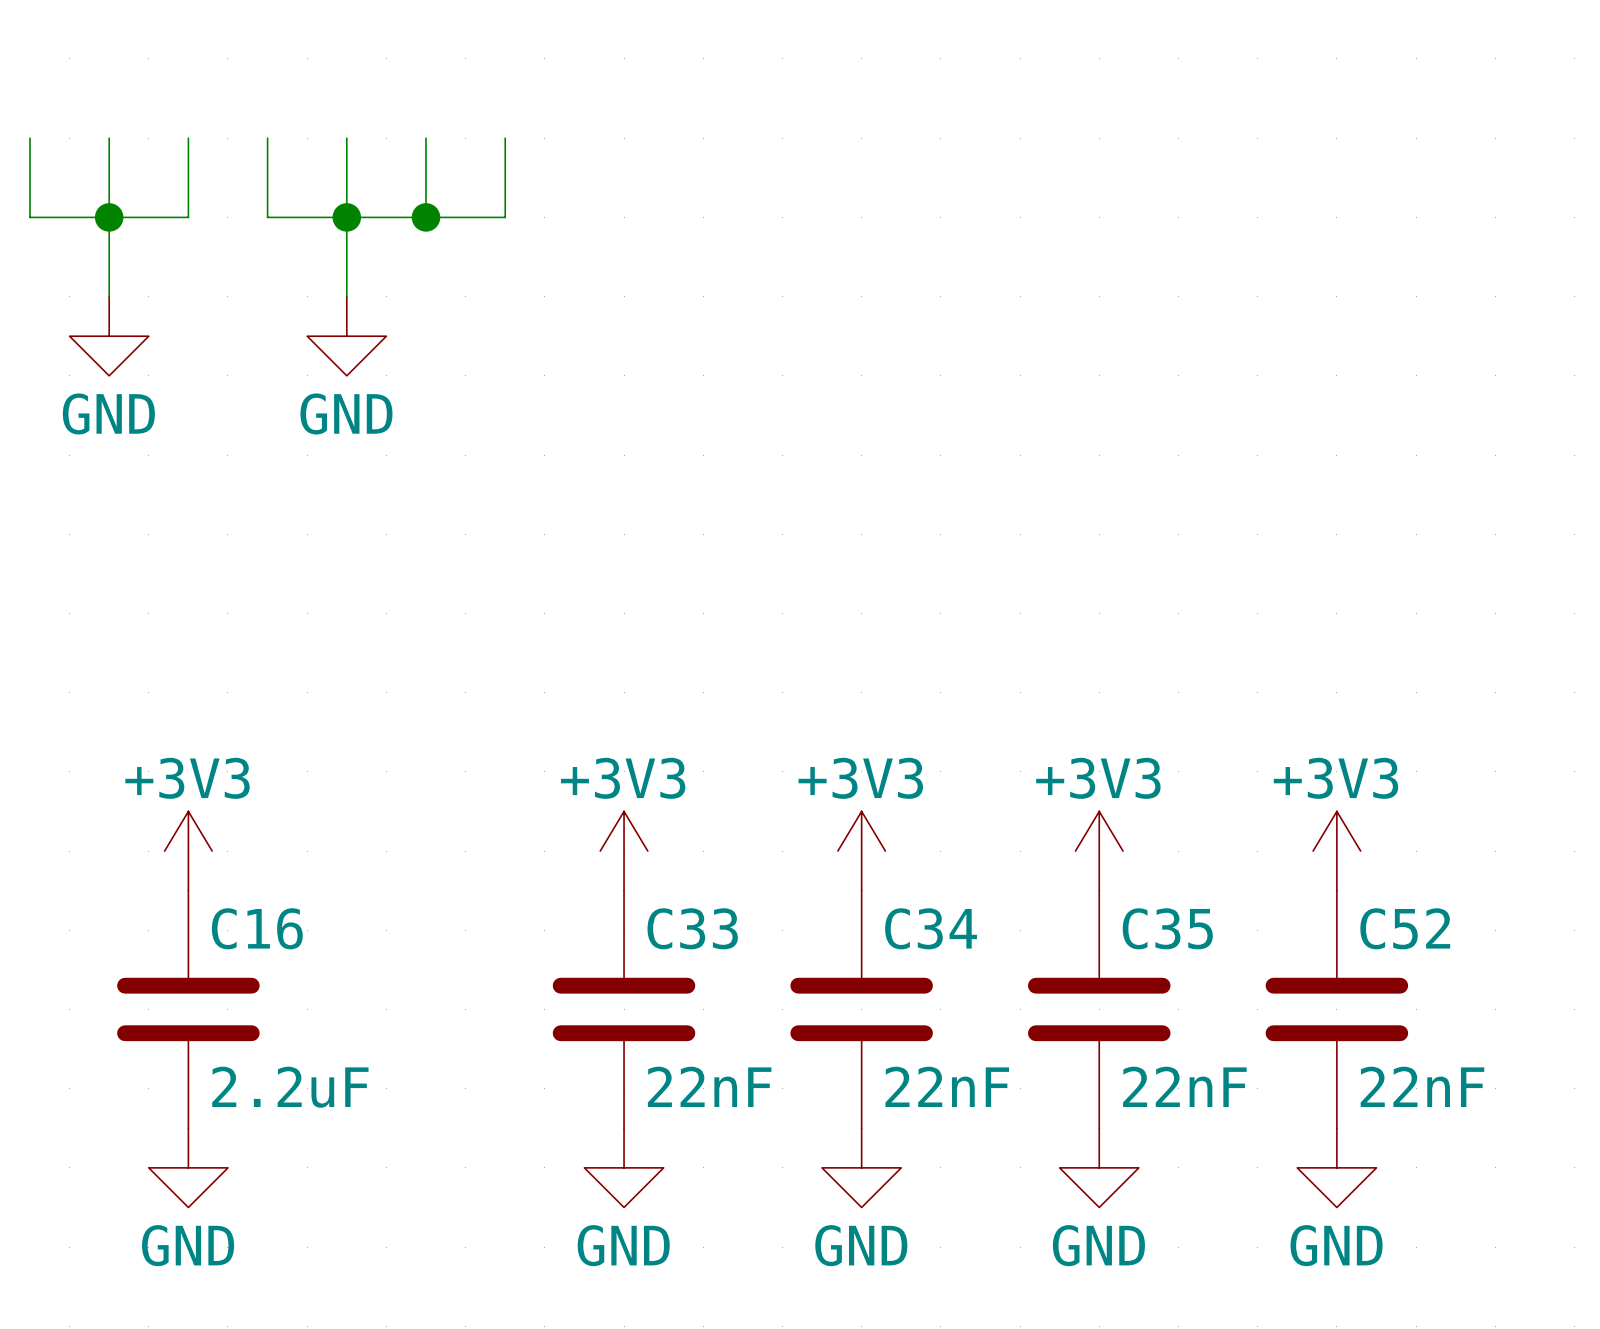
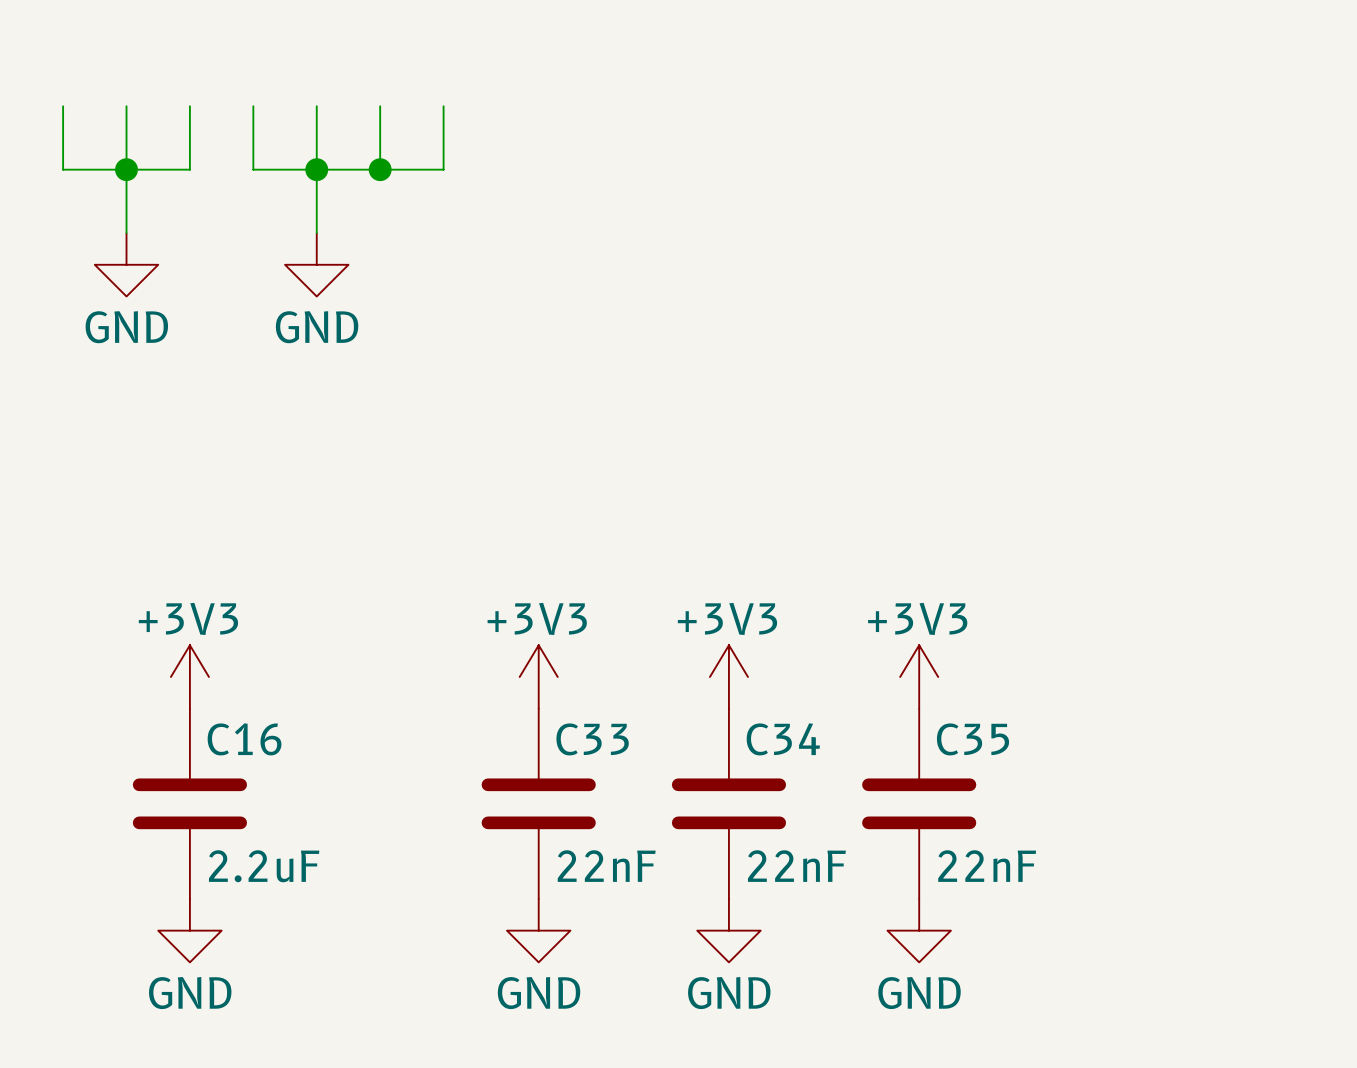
power symbol: +3V3 (1336, 851) -> none
C52: 22nF (1336, 1009) -> none
power symbol: GND (1336, 1167) -> none

